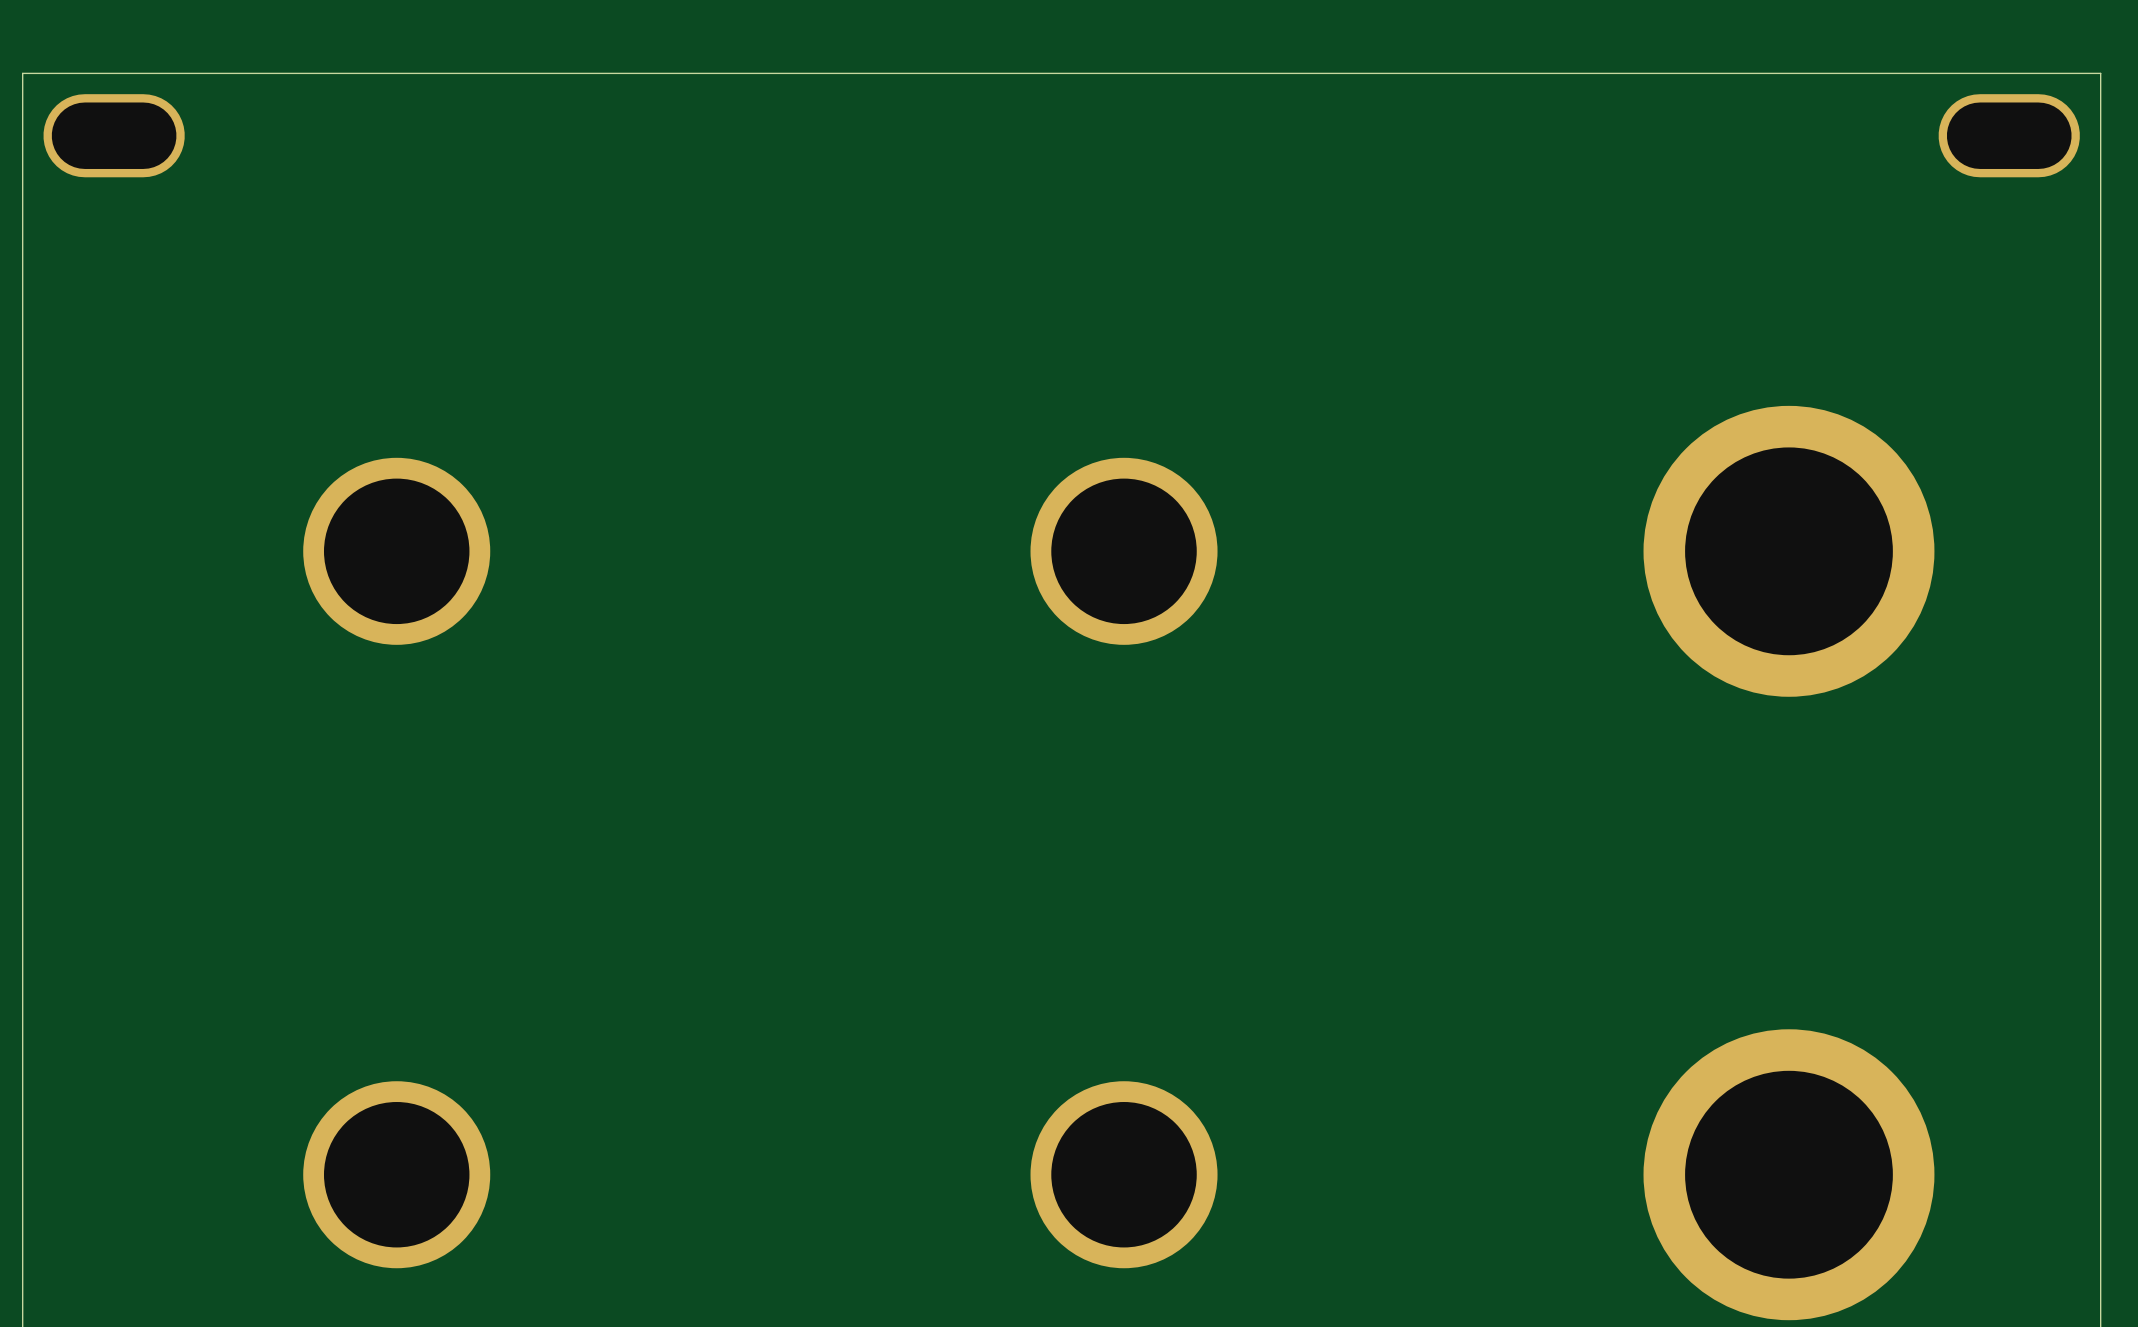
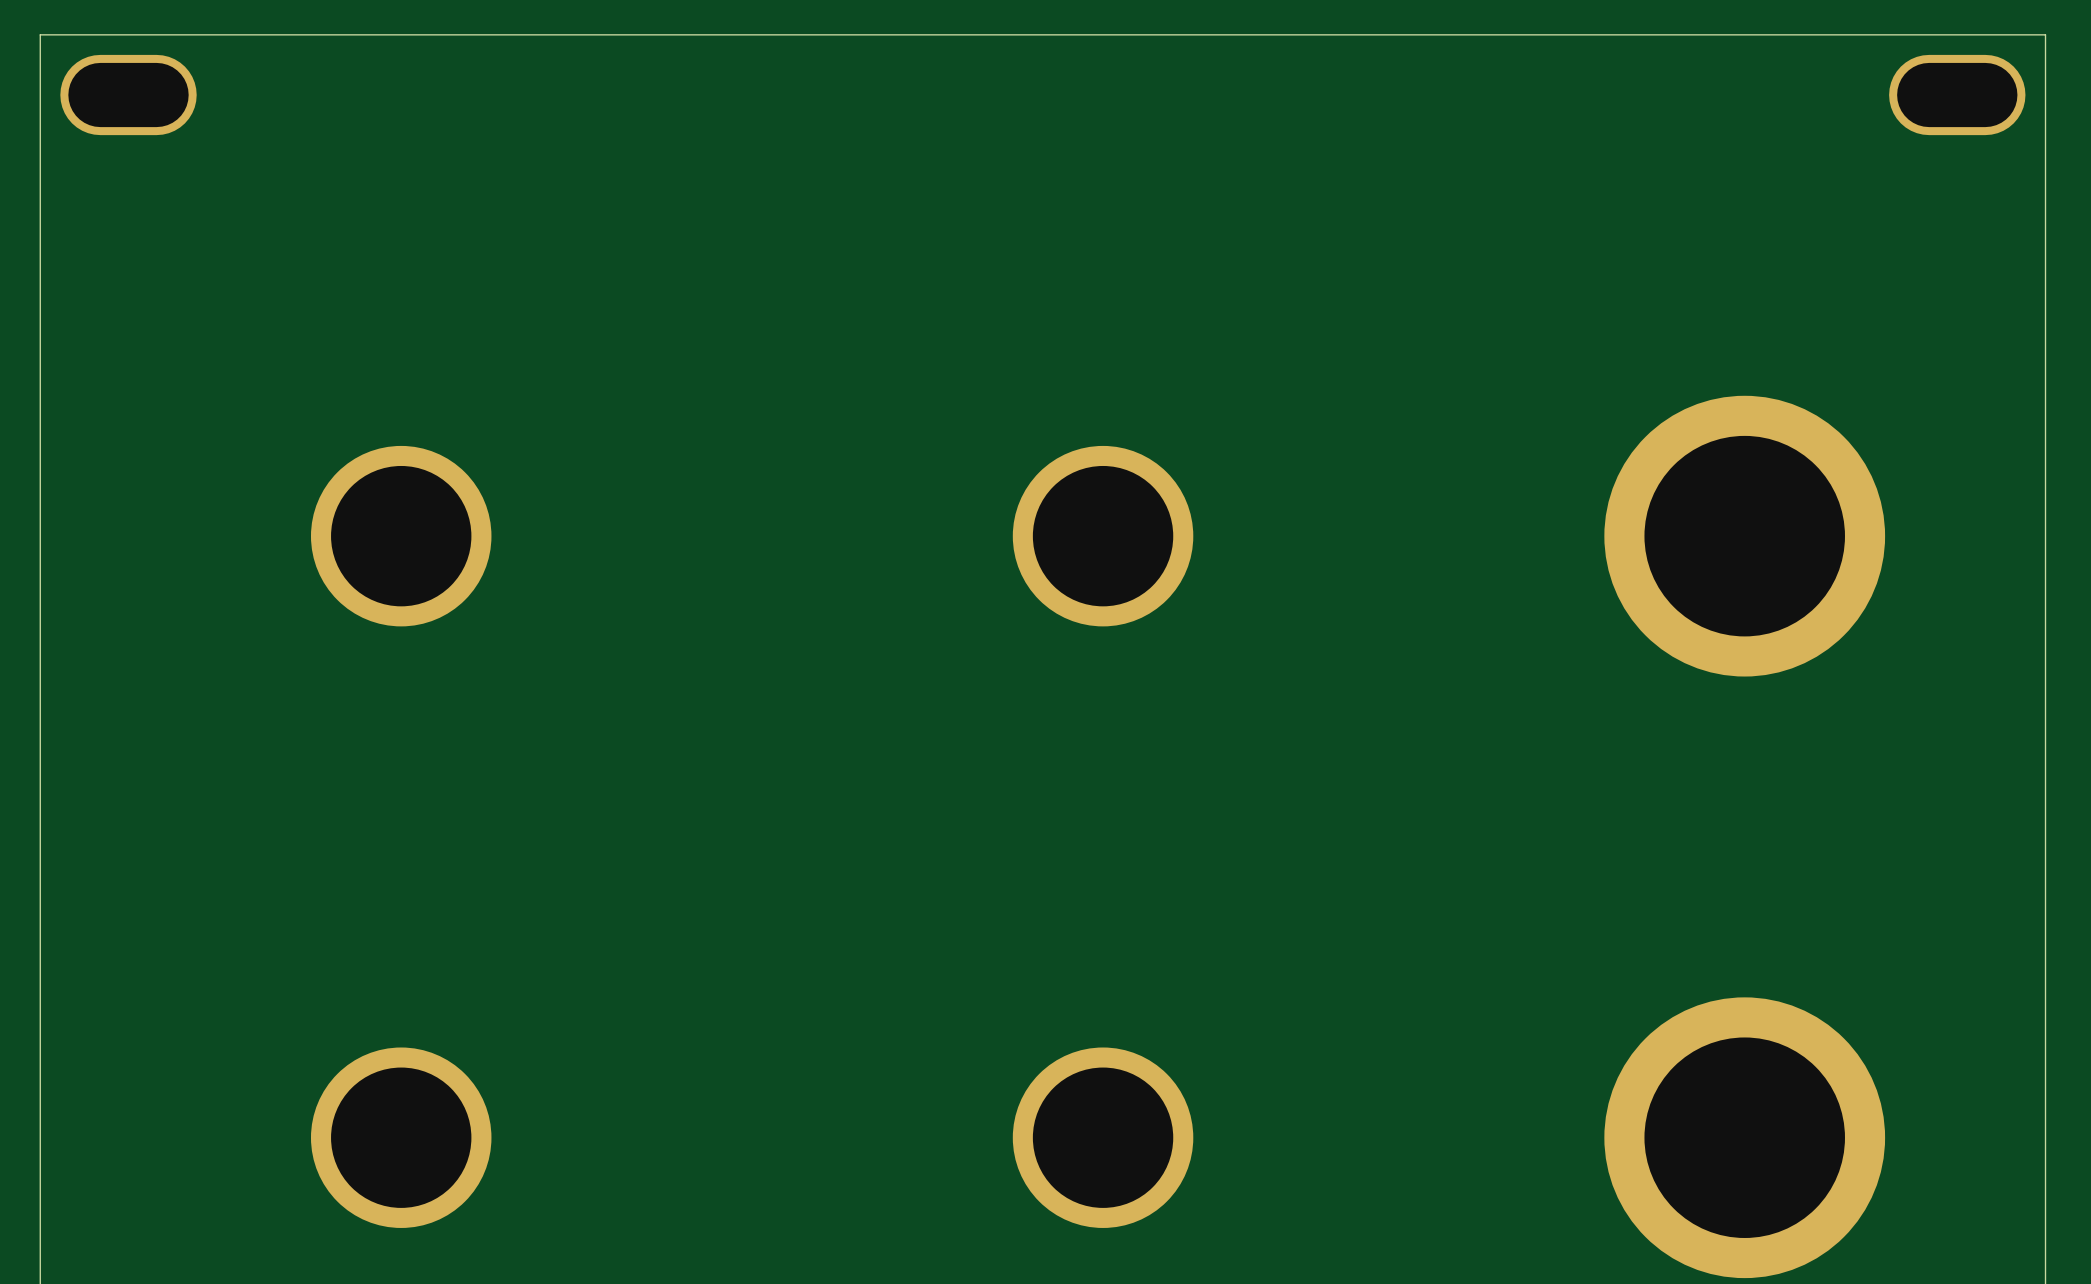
board edge: (2100, 73) (22, 73) -> (2045, 74) (2045, 34) (40, 34) (40, 74)
part position: (114, 135) -> (128, 95)
part position: (2009, 135) -> (1957, 95)

